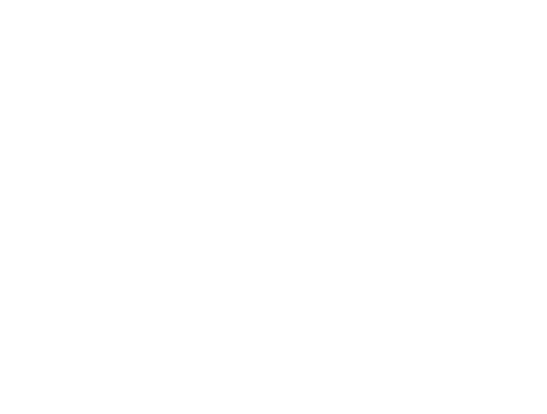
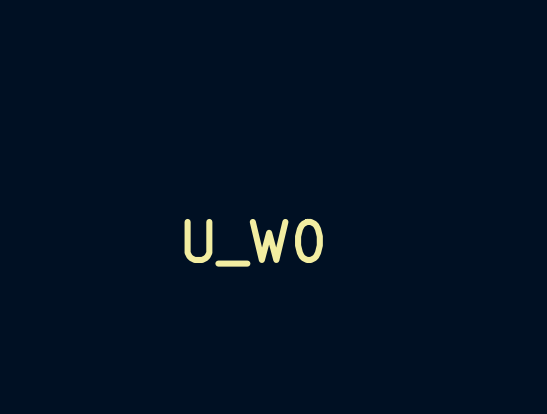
U_W0: none -> (253, 242)

